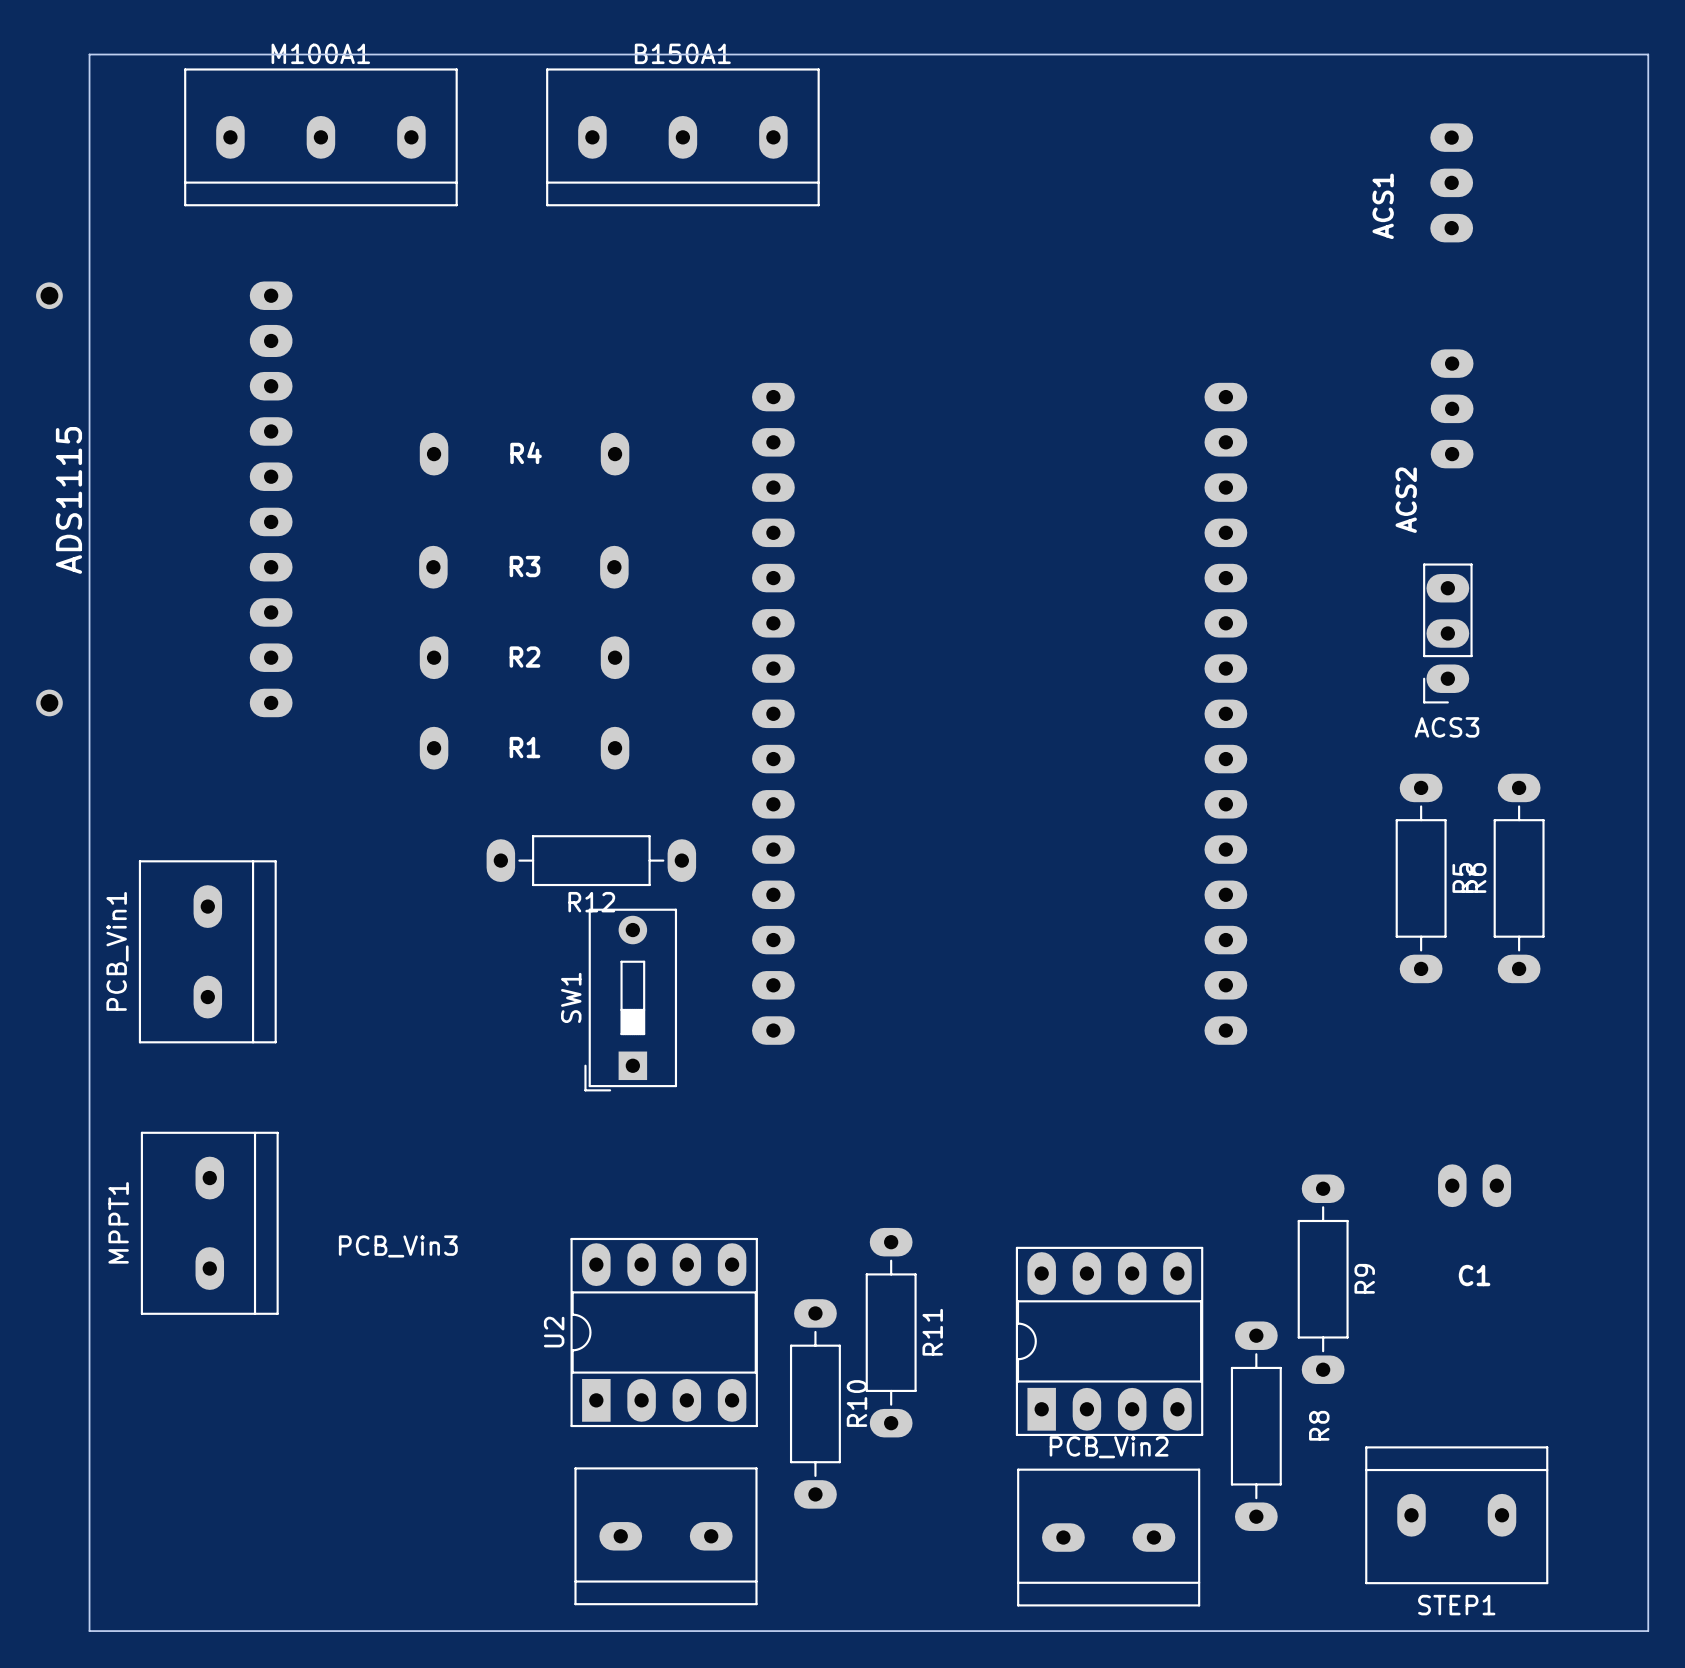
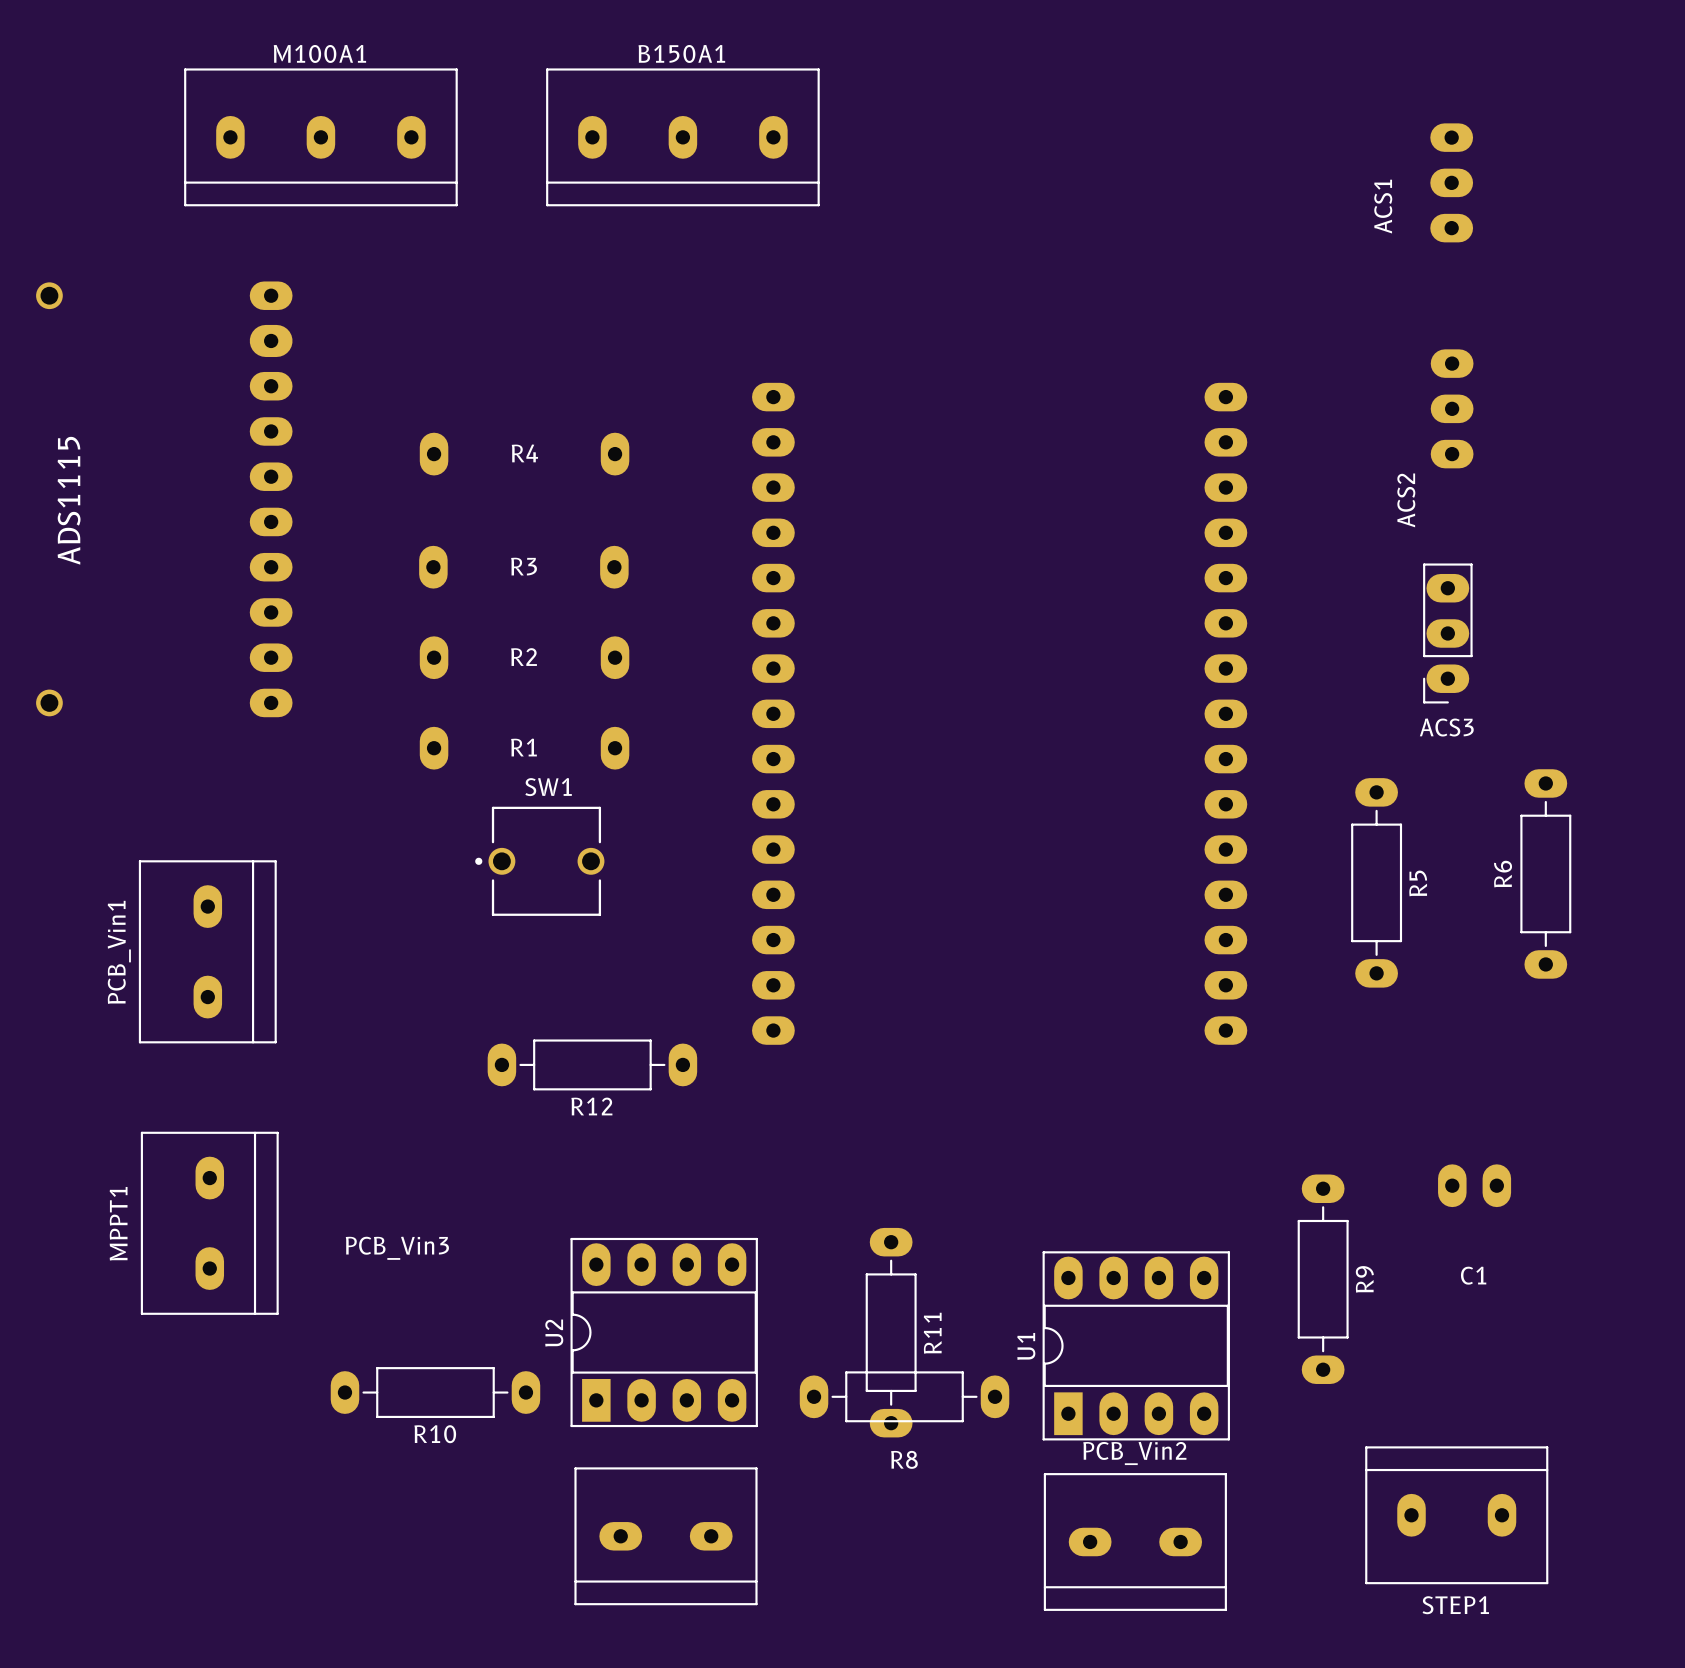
board edge: (89, 54) (1648, 54) (1648, 1631) (89, 1631) (89, 54) -> none
R12 position: (591, 860) -> (592, 1064)
R5 position: (1421, 878) -> (1376, 882)
R6 position: (1519, 878) -> (1545, 873)
SW1 footprint: [584, 908, 678, 1092] -> [475, 806, 605, 916]
SW1 name position: SW1 (571, 997) -> SW1 (548, 787)
part: (1109, 1341) -> none
U1: none -> (1136, 1345)
R10 rotation: 0° (815, 1403) -> 90° clockwise (435, 1392)
R10 position: (815, 1403) -> (435, 1392)
R8 rotation: 0° (1256, 1426) -> 90° clockwise (904, 1396)
R8 position: (1256, 1426) -> (904, 1396)
PCB_Vin2 position: (1108, 1537) -> (1135, 1541)

